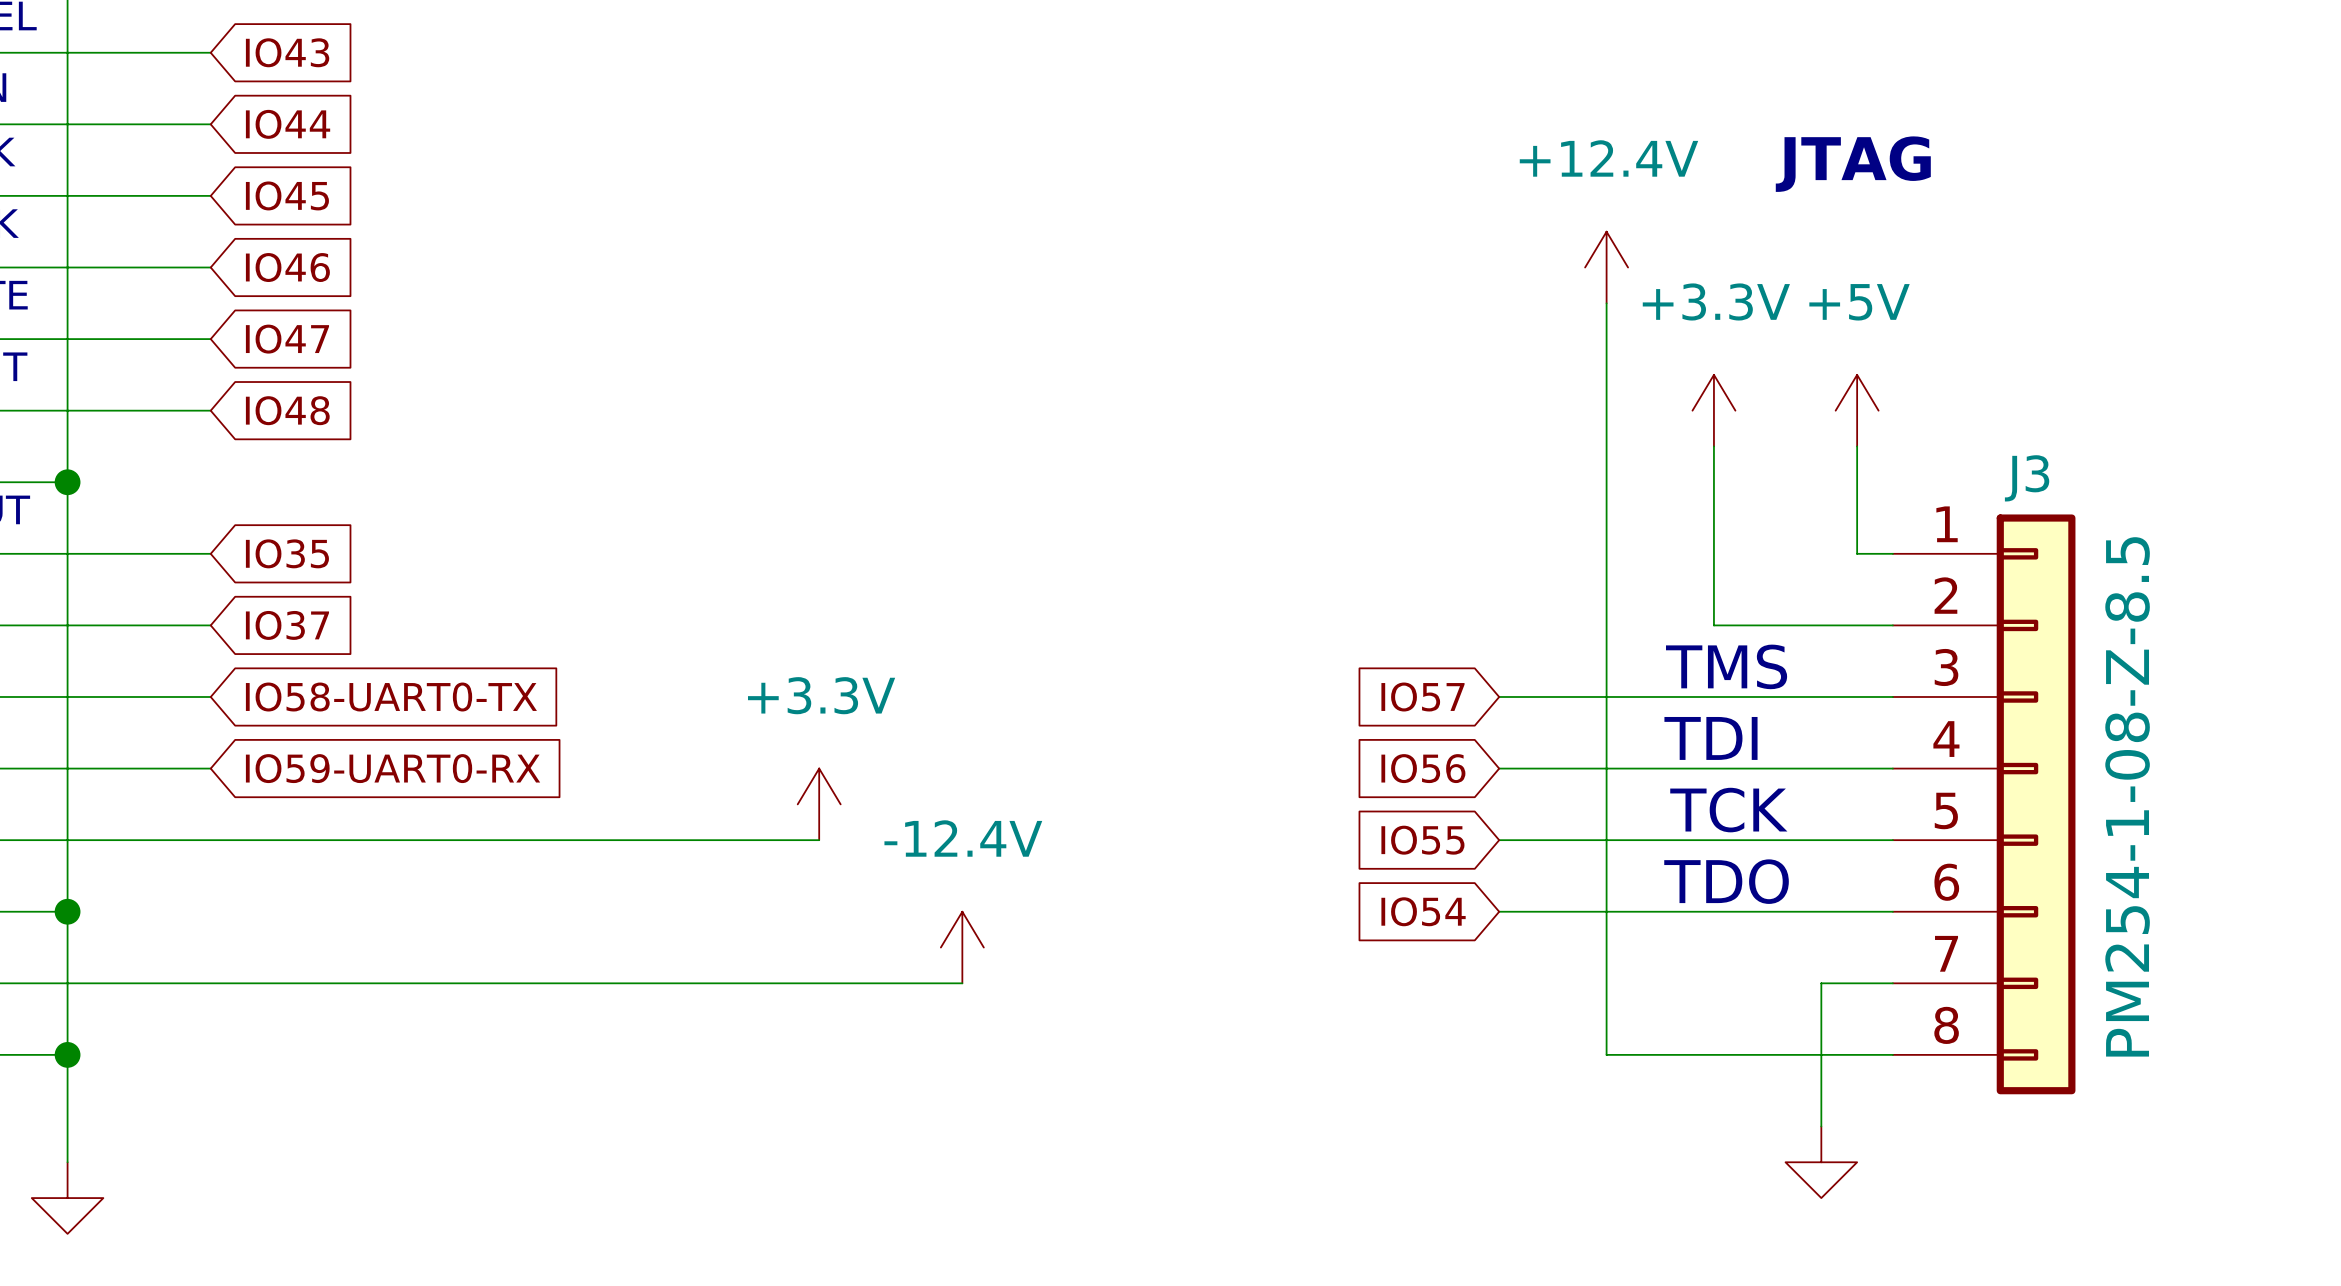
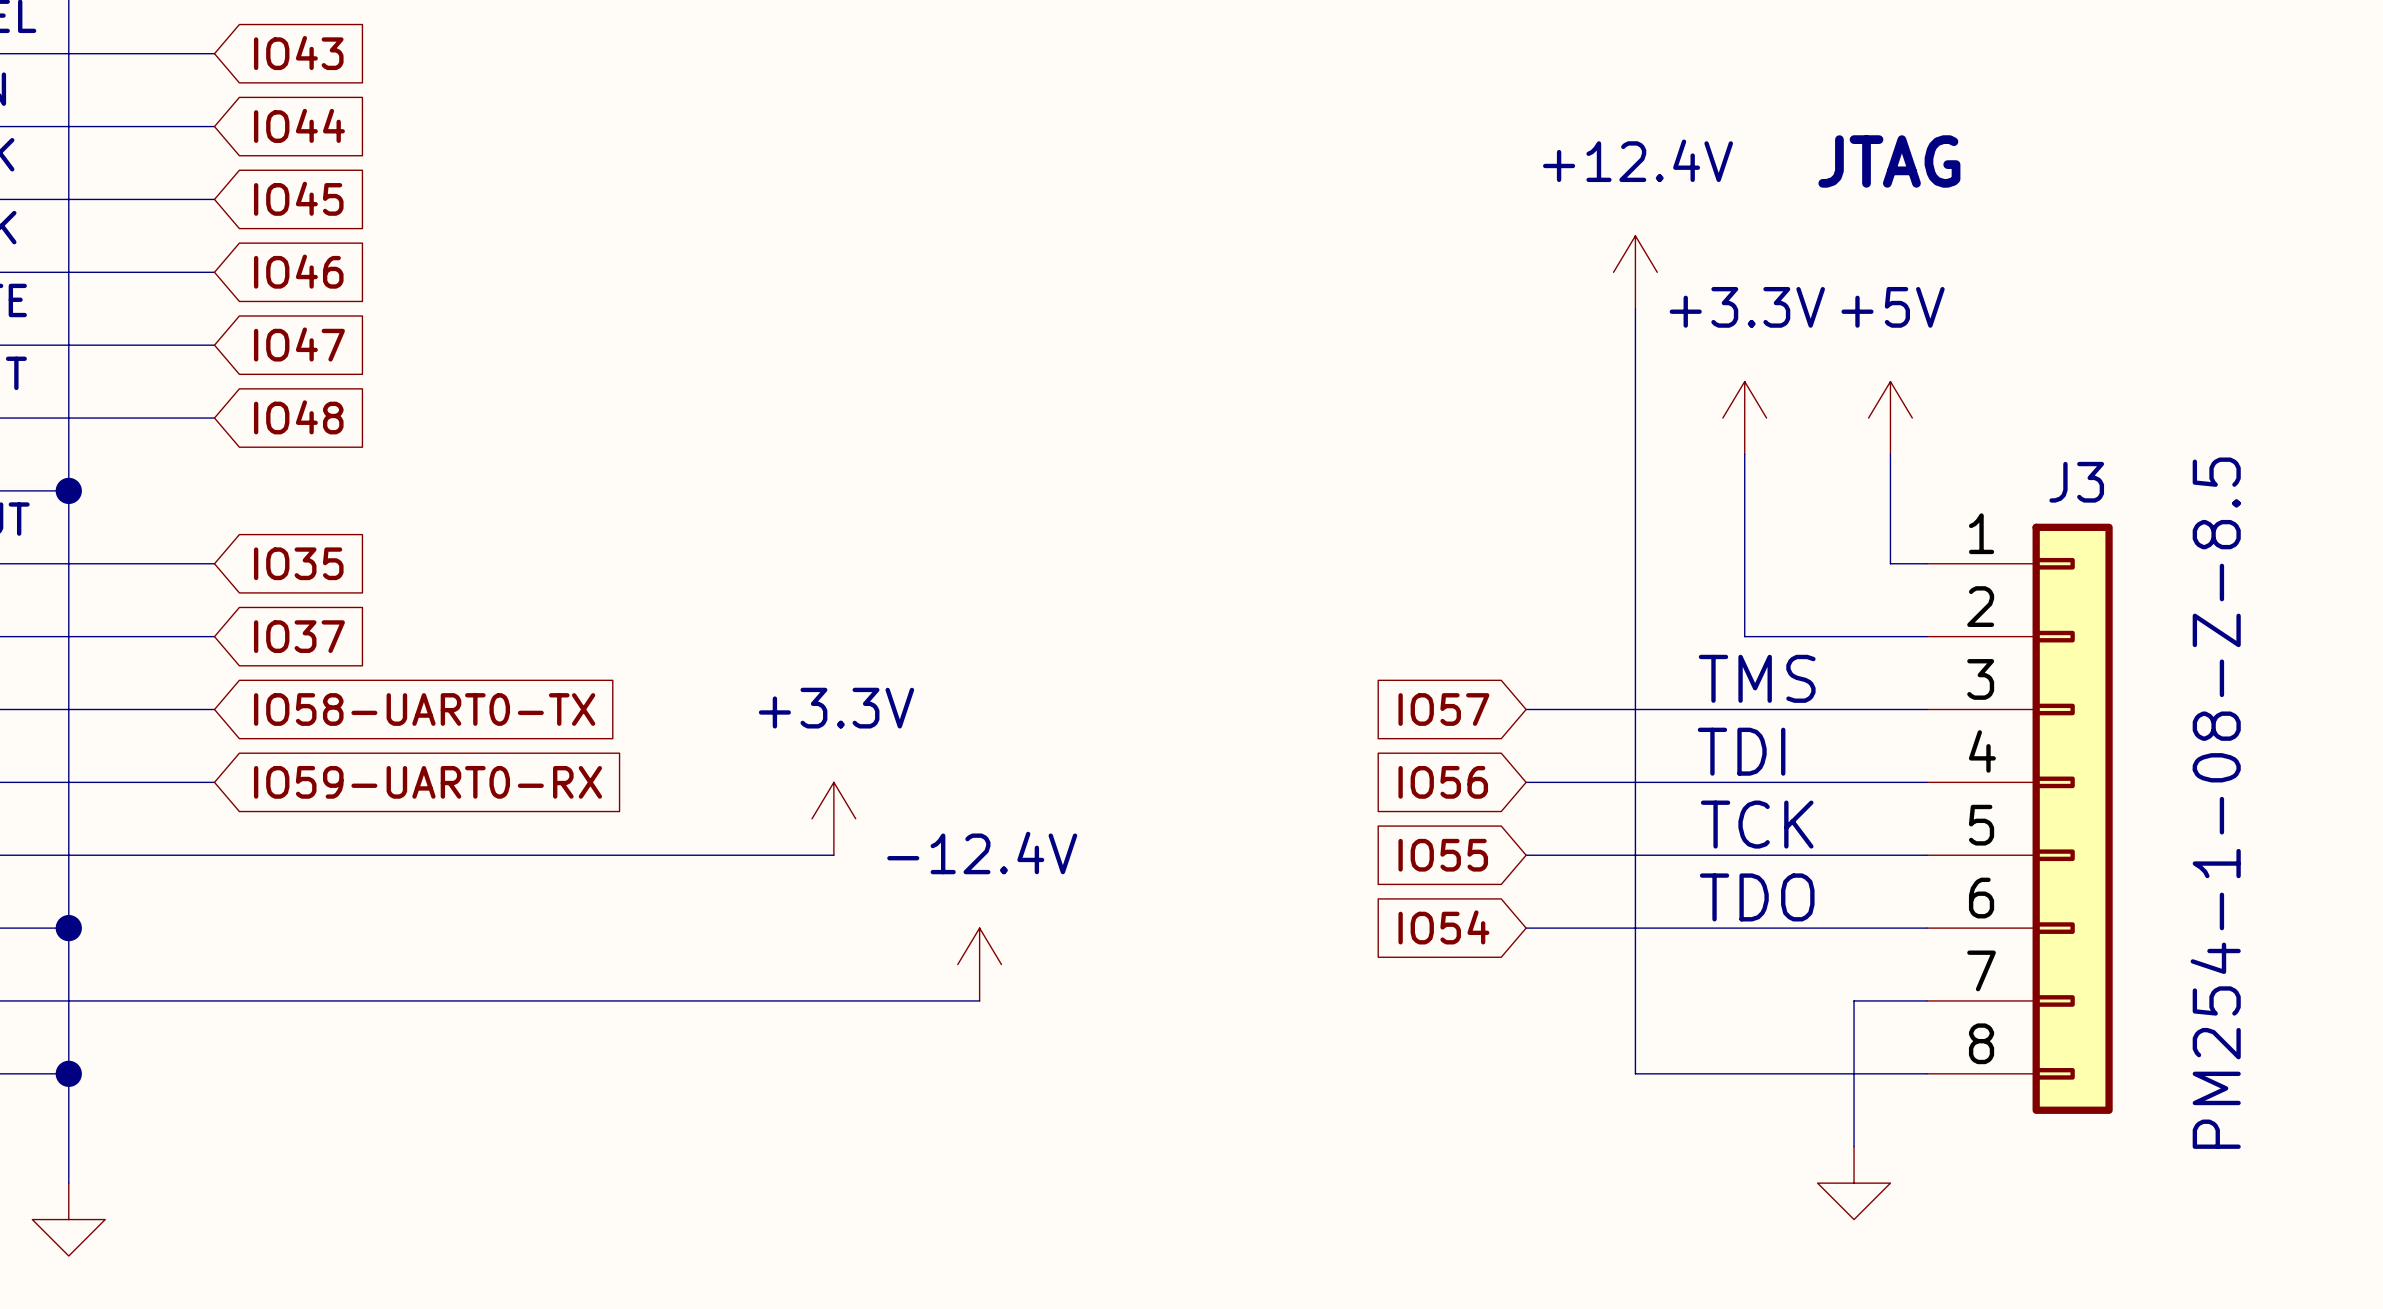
J3 text position: PM254-1-08-Z-8.5 (2127, 796) -> PM254-1-08-Z-8.5 (2215, 803)

